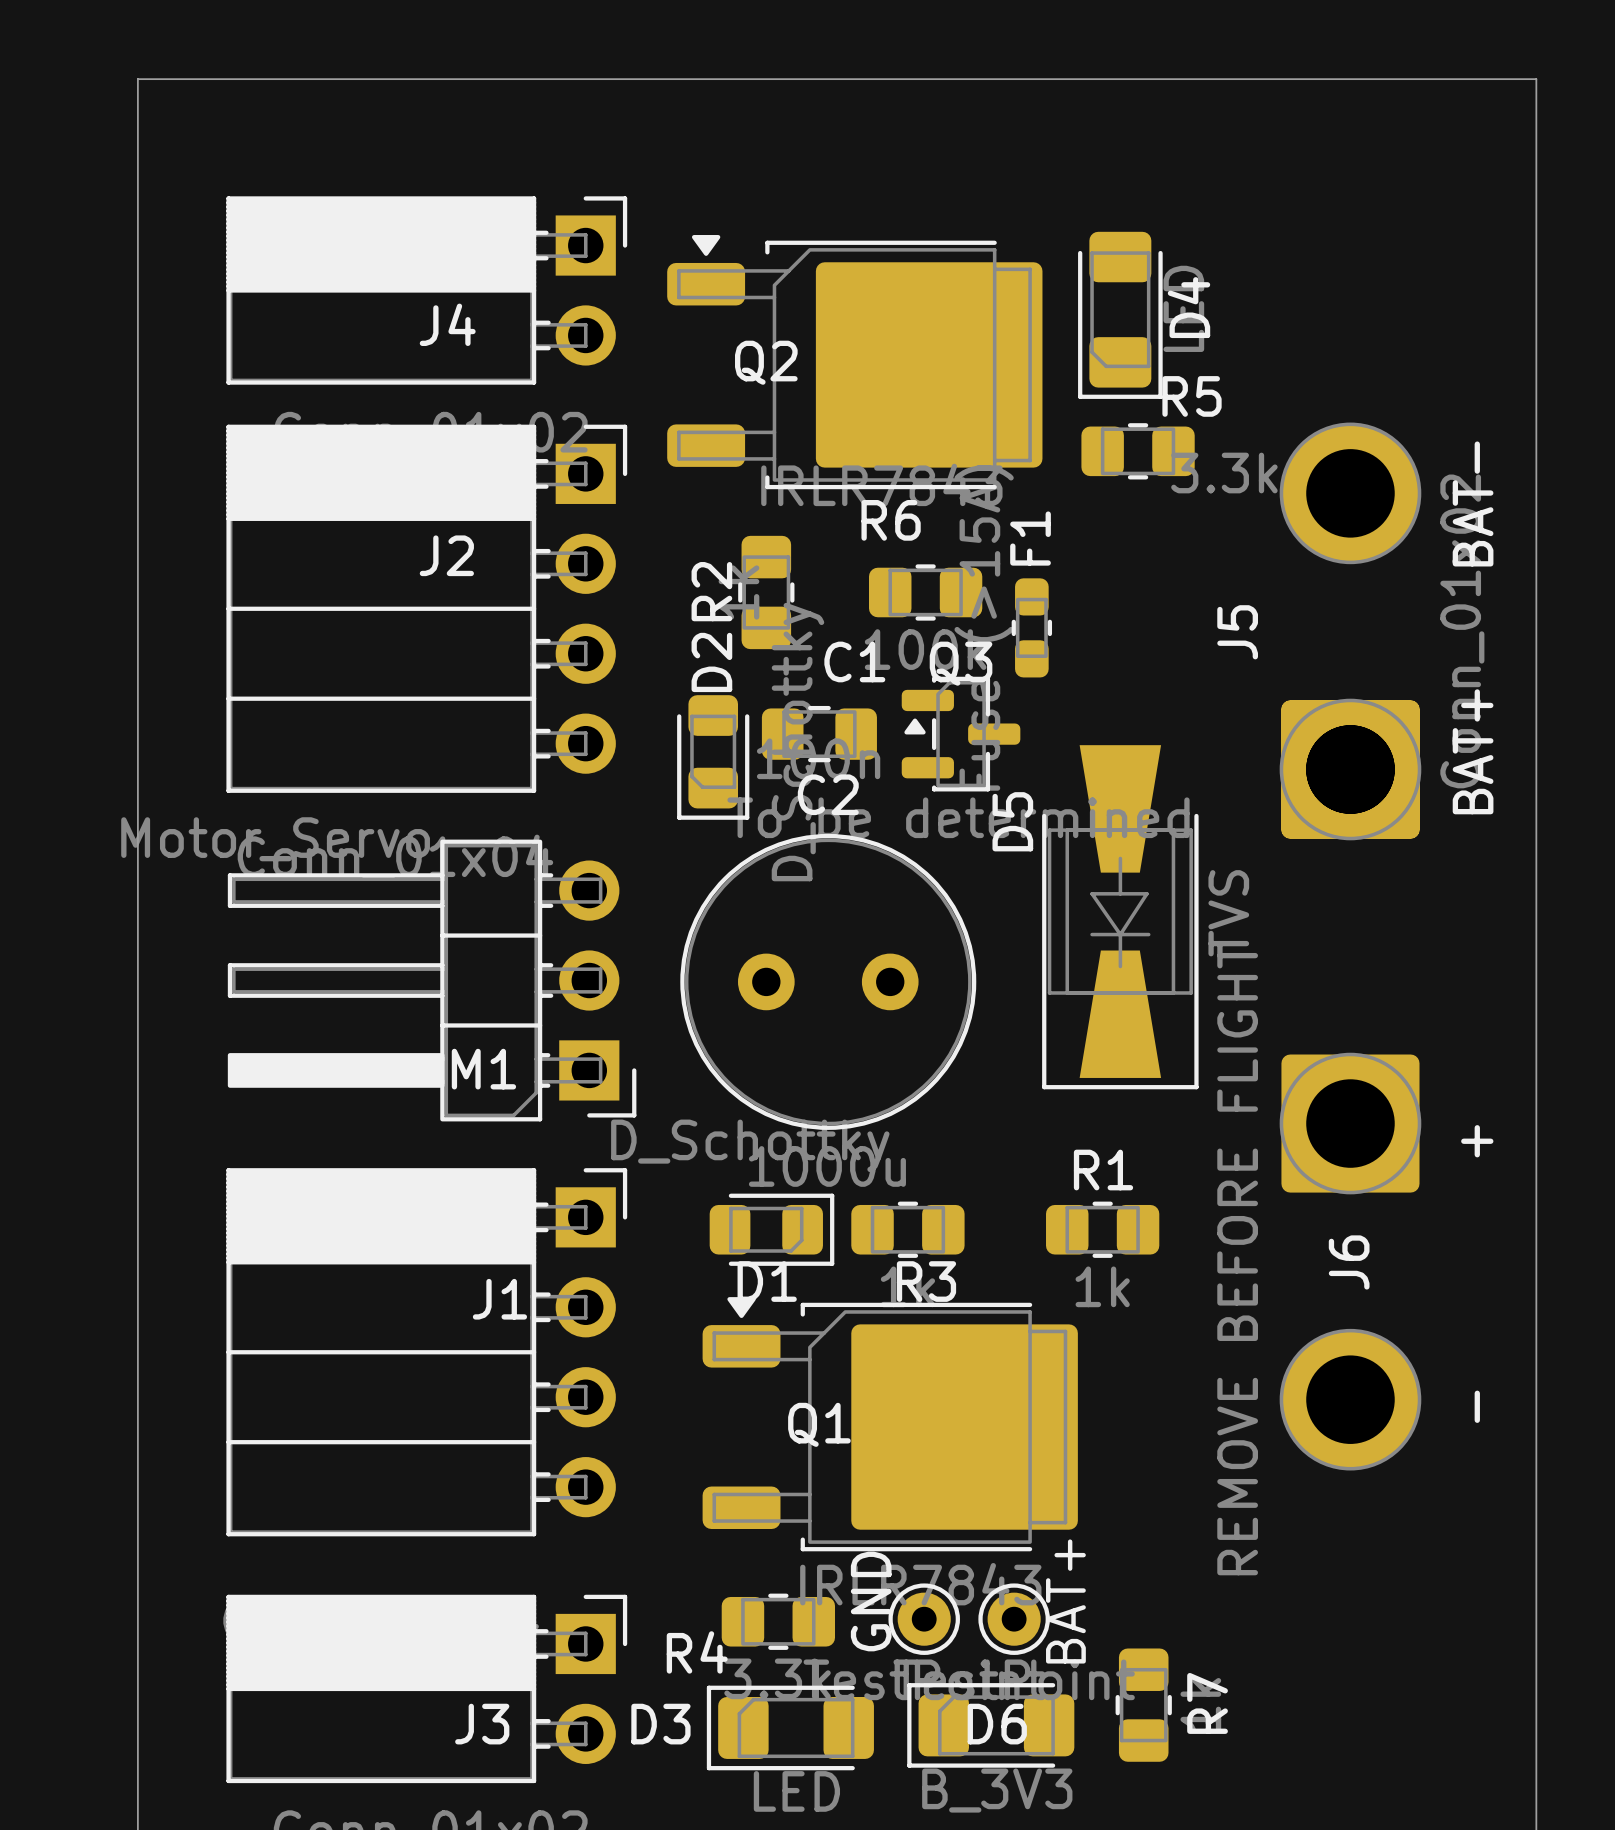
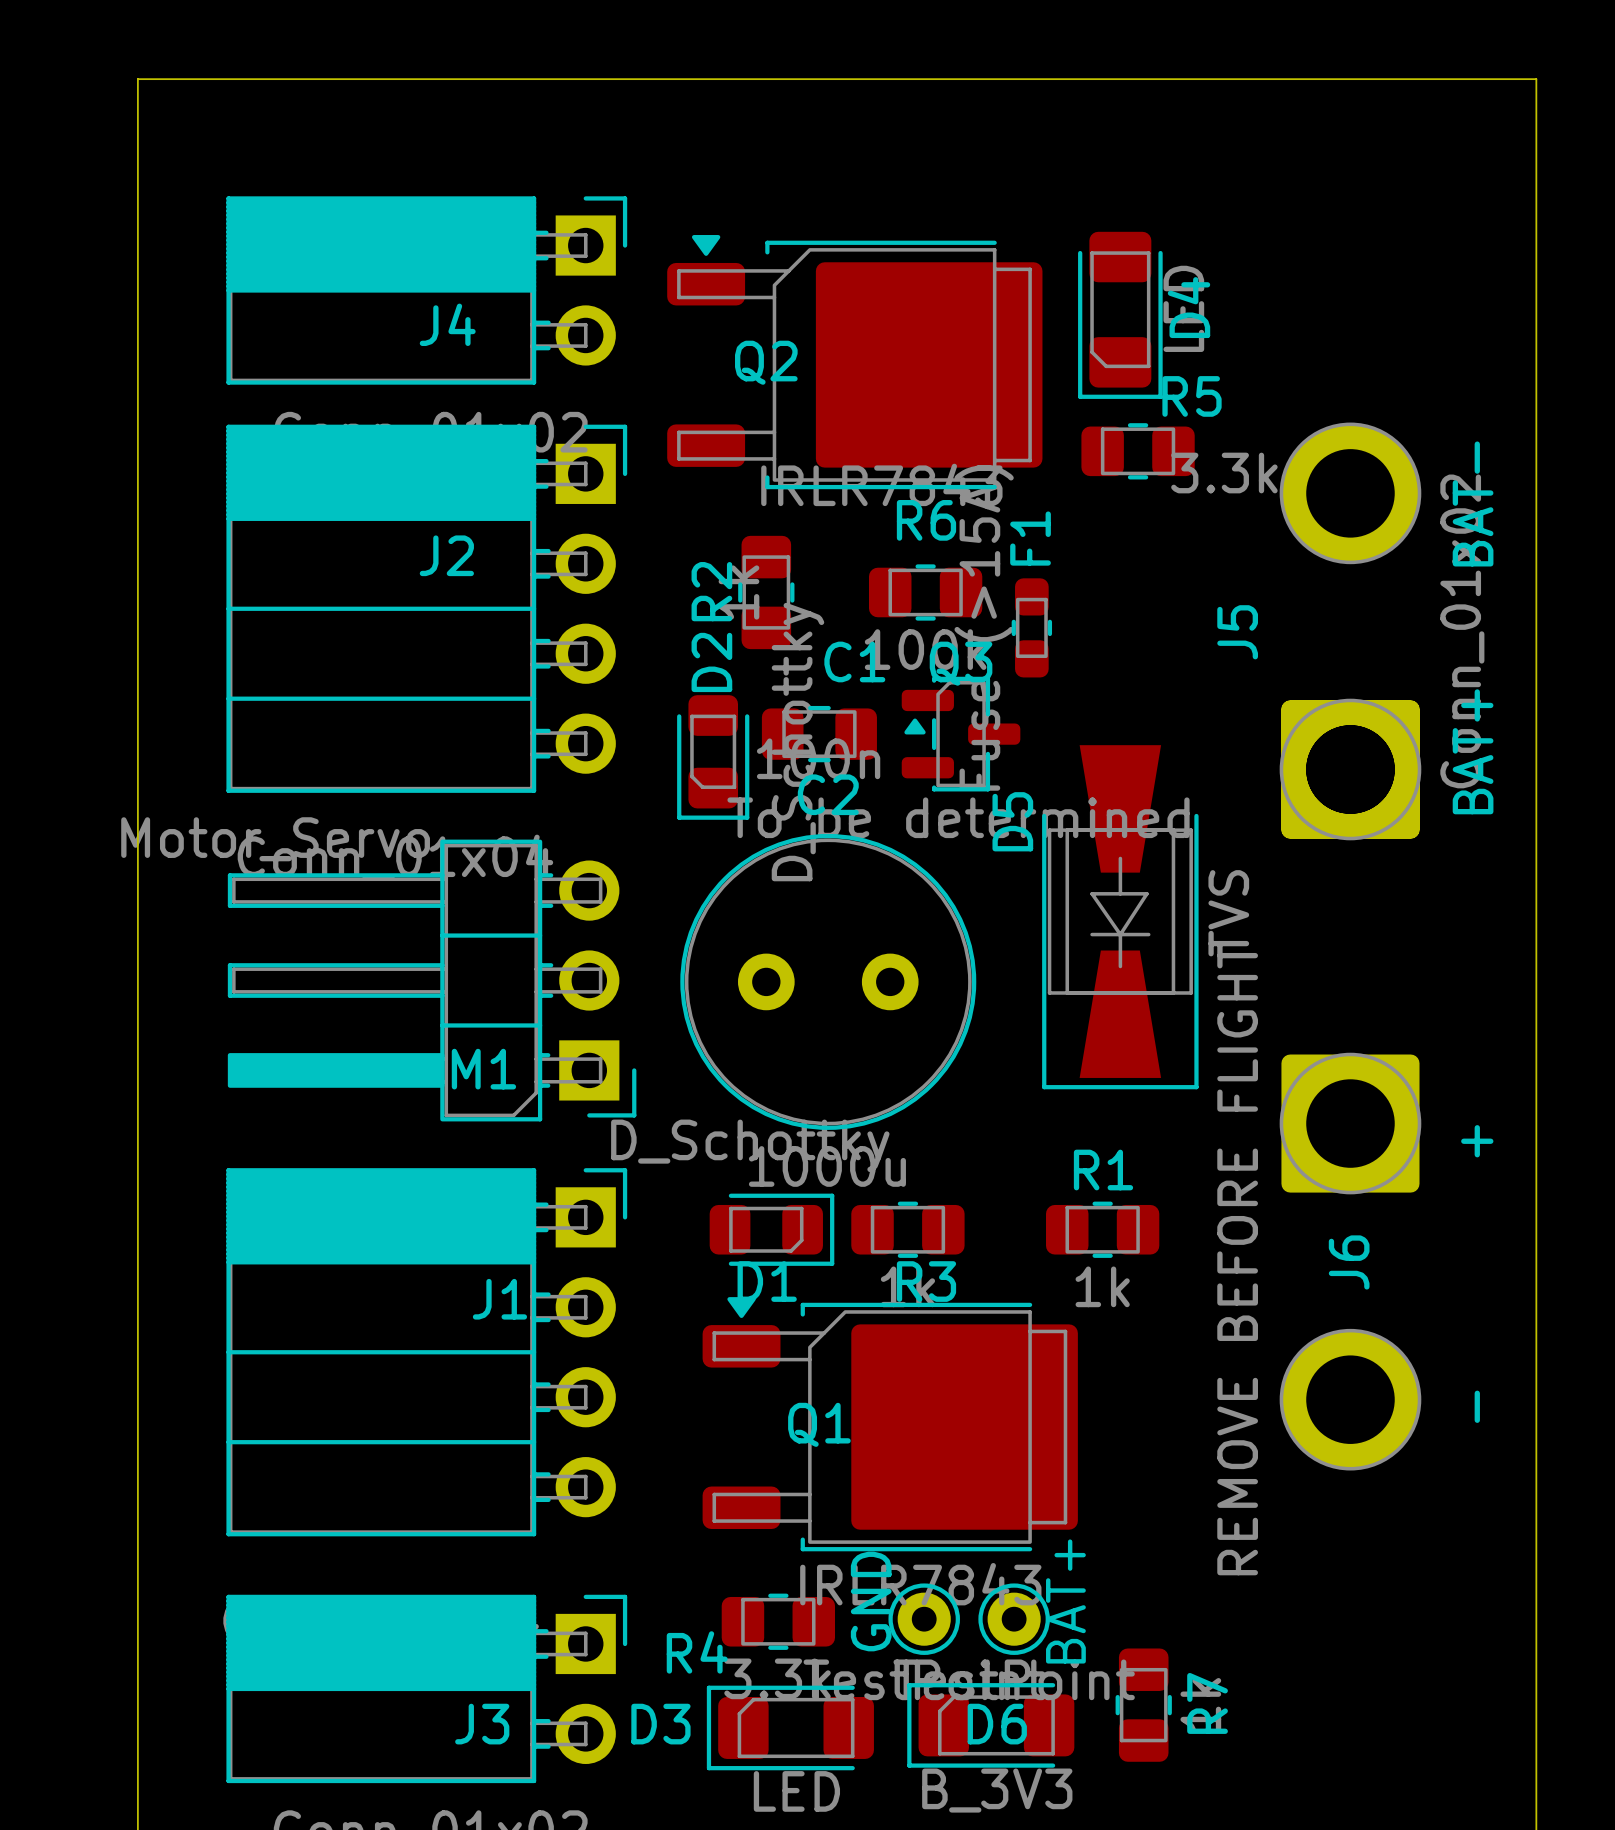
R6 name position: R6 (891, 520) -> R6 (926, 520)

